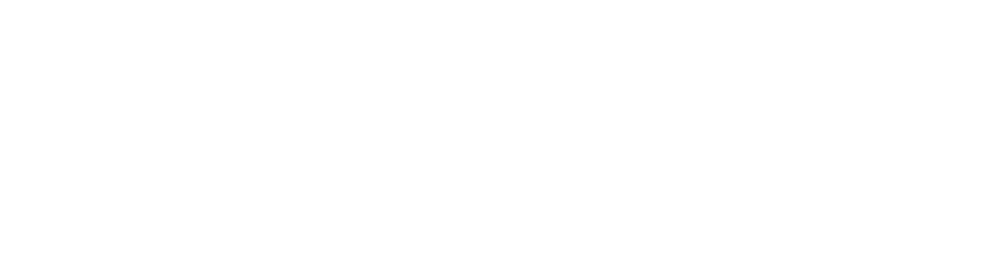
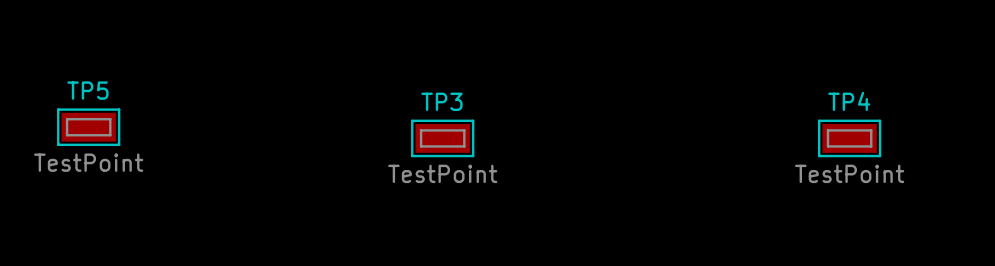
TP5: none -> TestPoint (88, 127)
TP3: none -> TestPoint (442, 138)
TP4: none -> TestPoint (849, 138)

